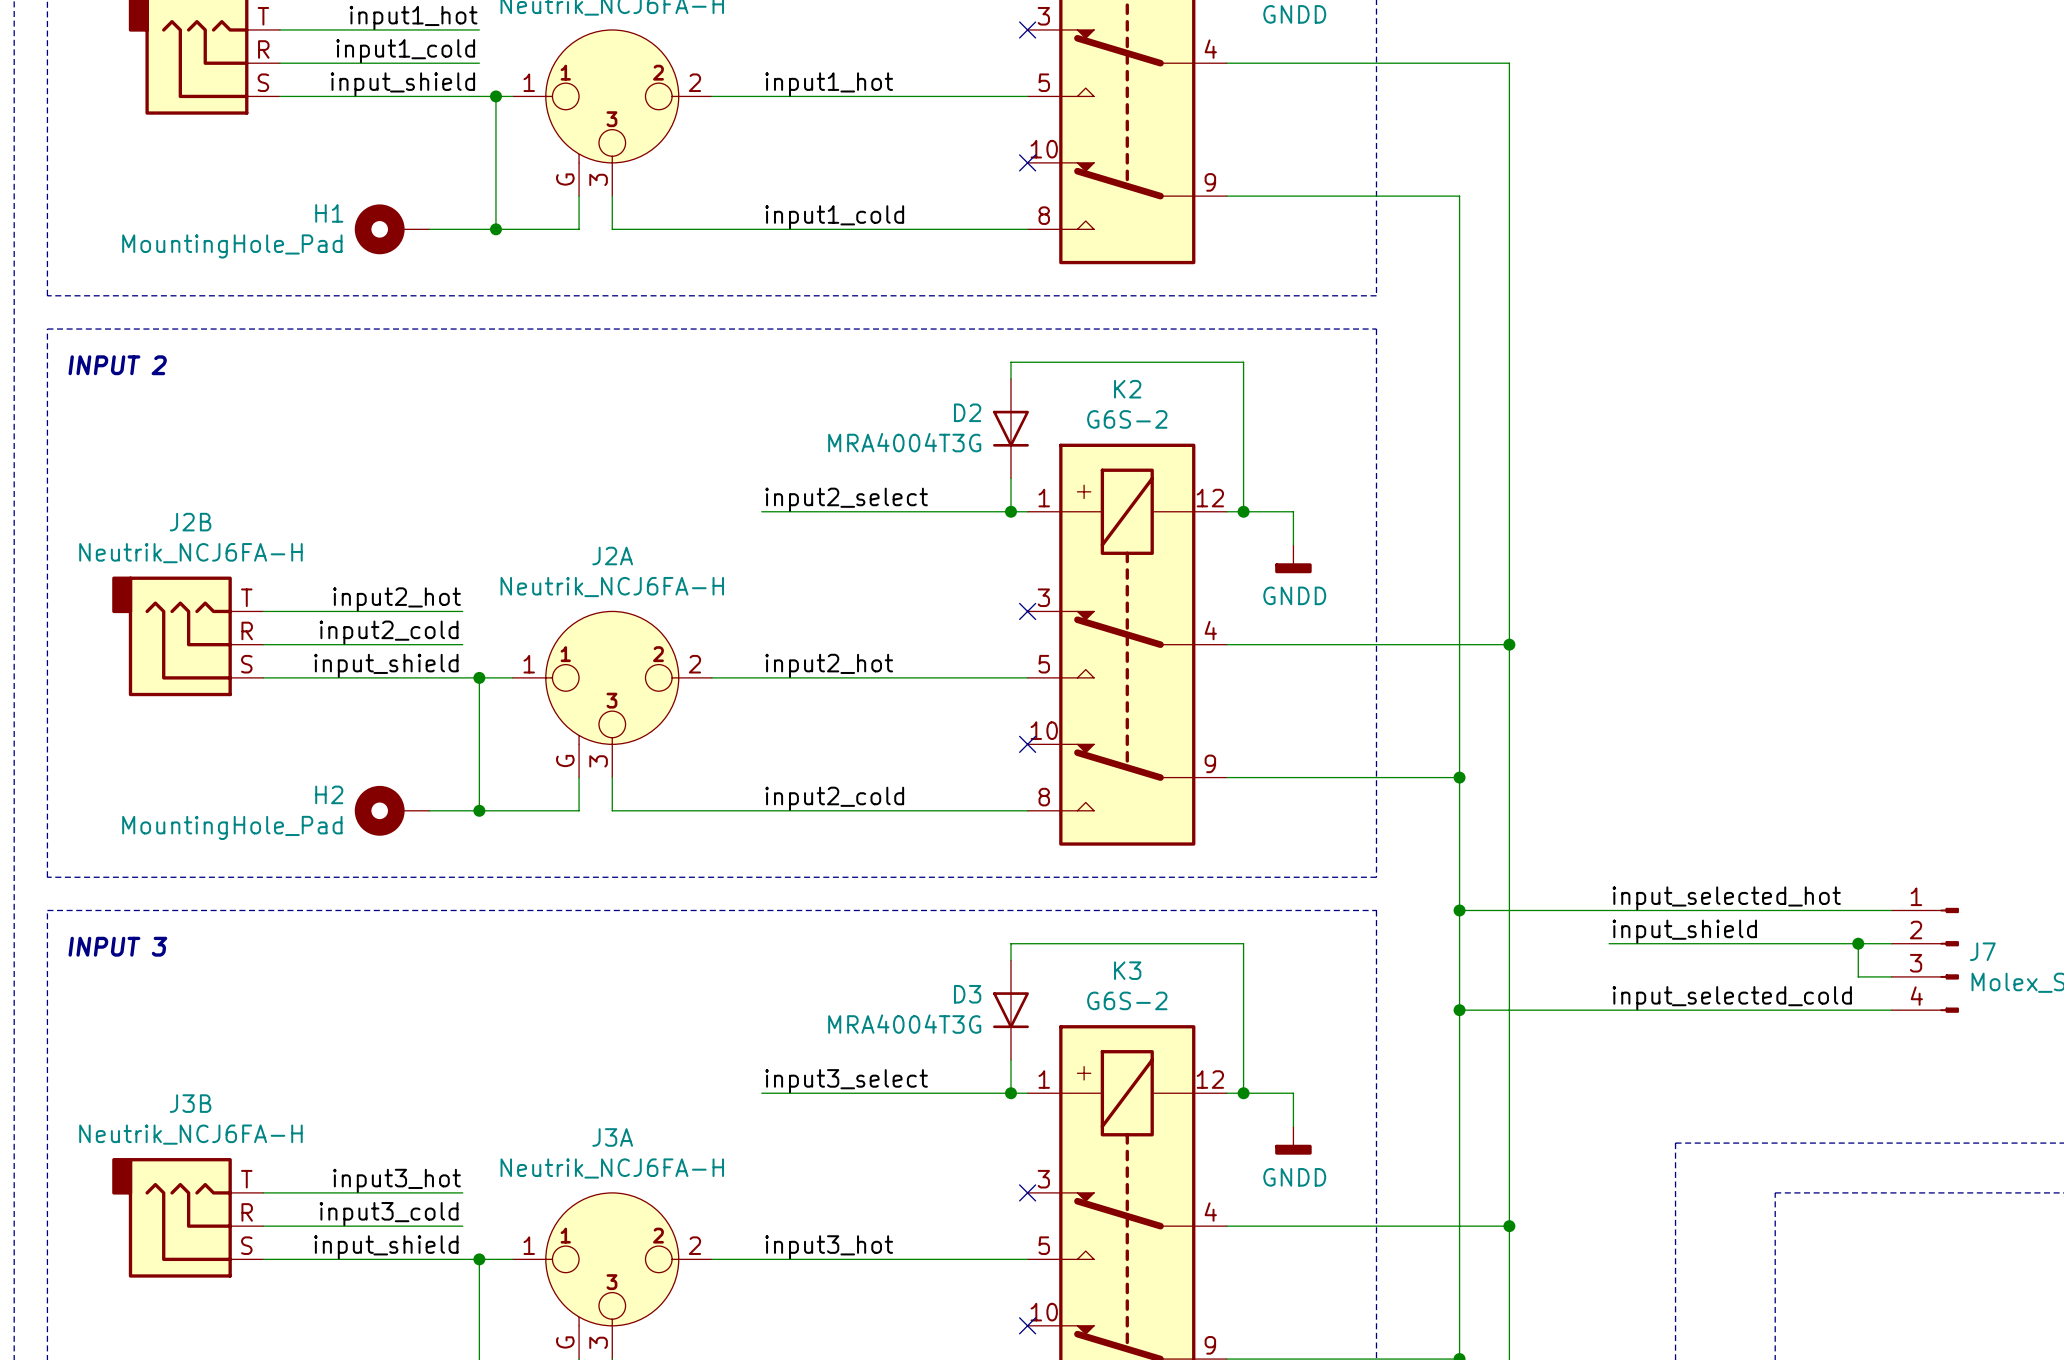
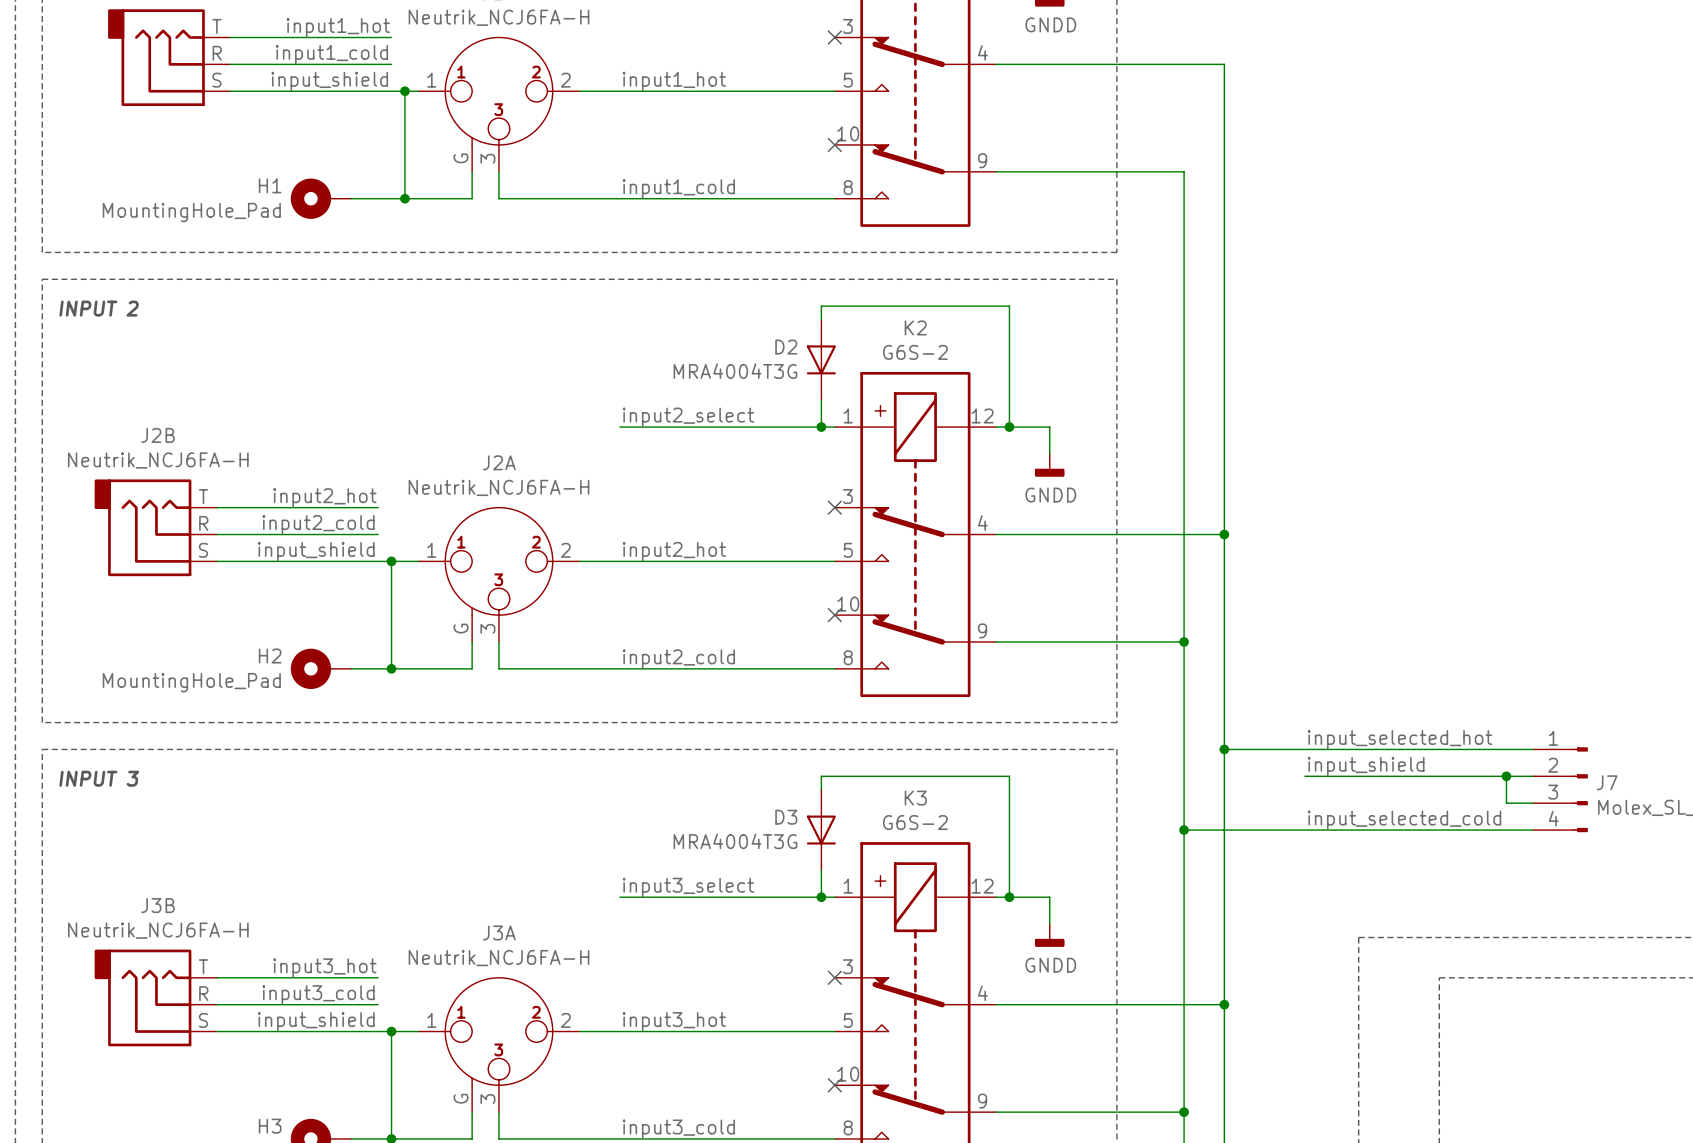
wire: (1459, 910) (1509, 910) -> none
junction position: (1459, 910) -> (1224, 749)

